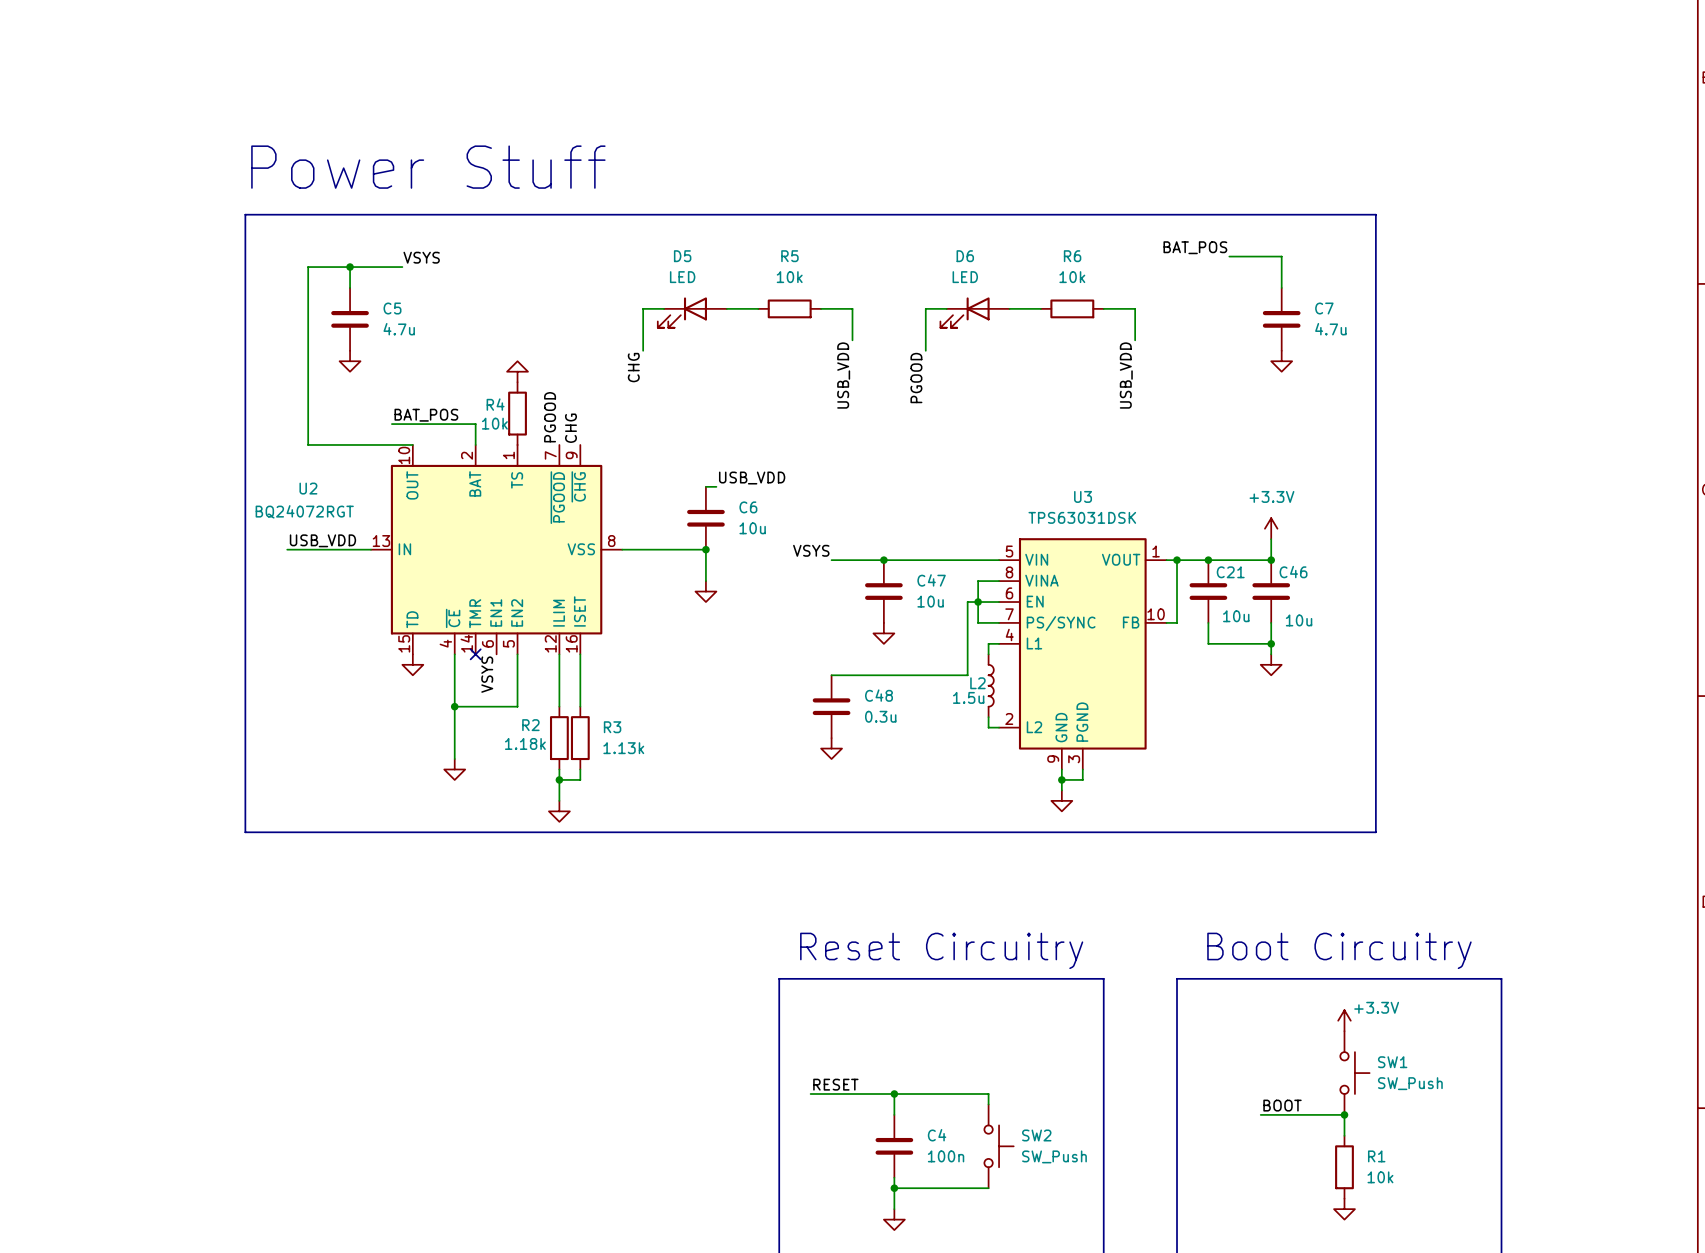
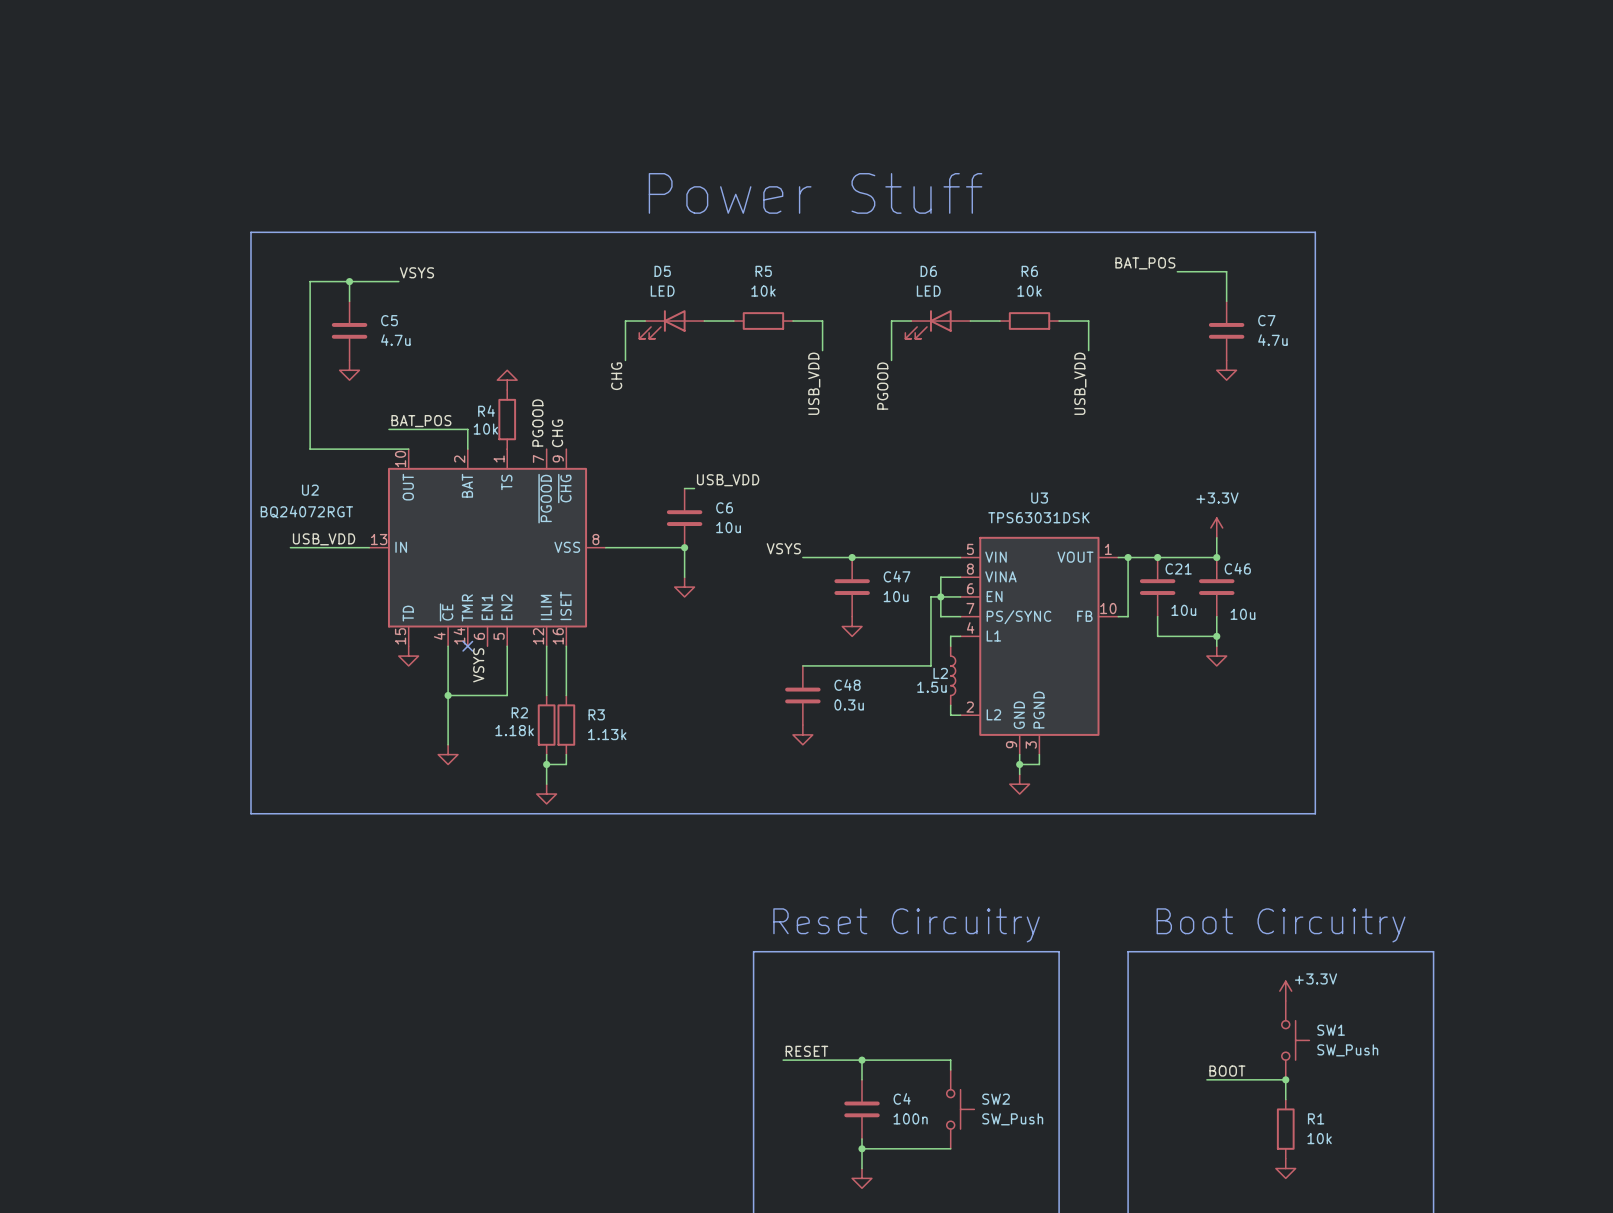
text: Power Stuff (428, 167) -> none
text: none -> Power Stuff (815, 193)

